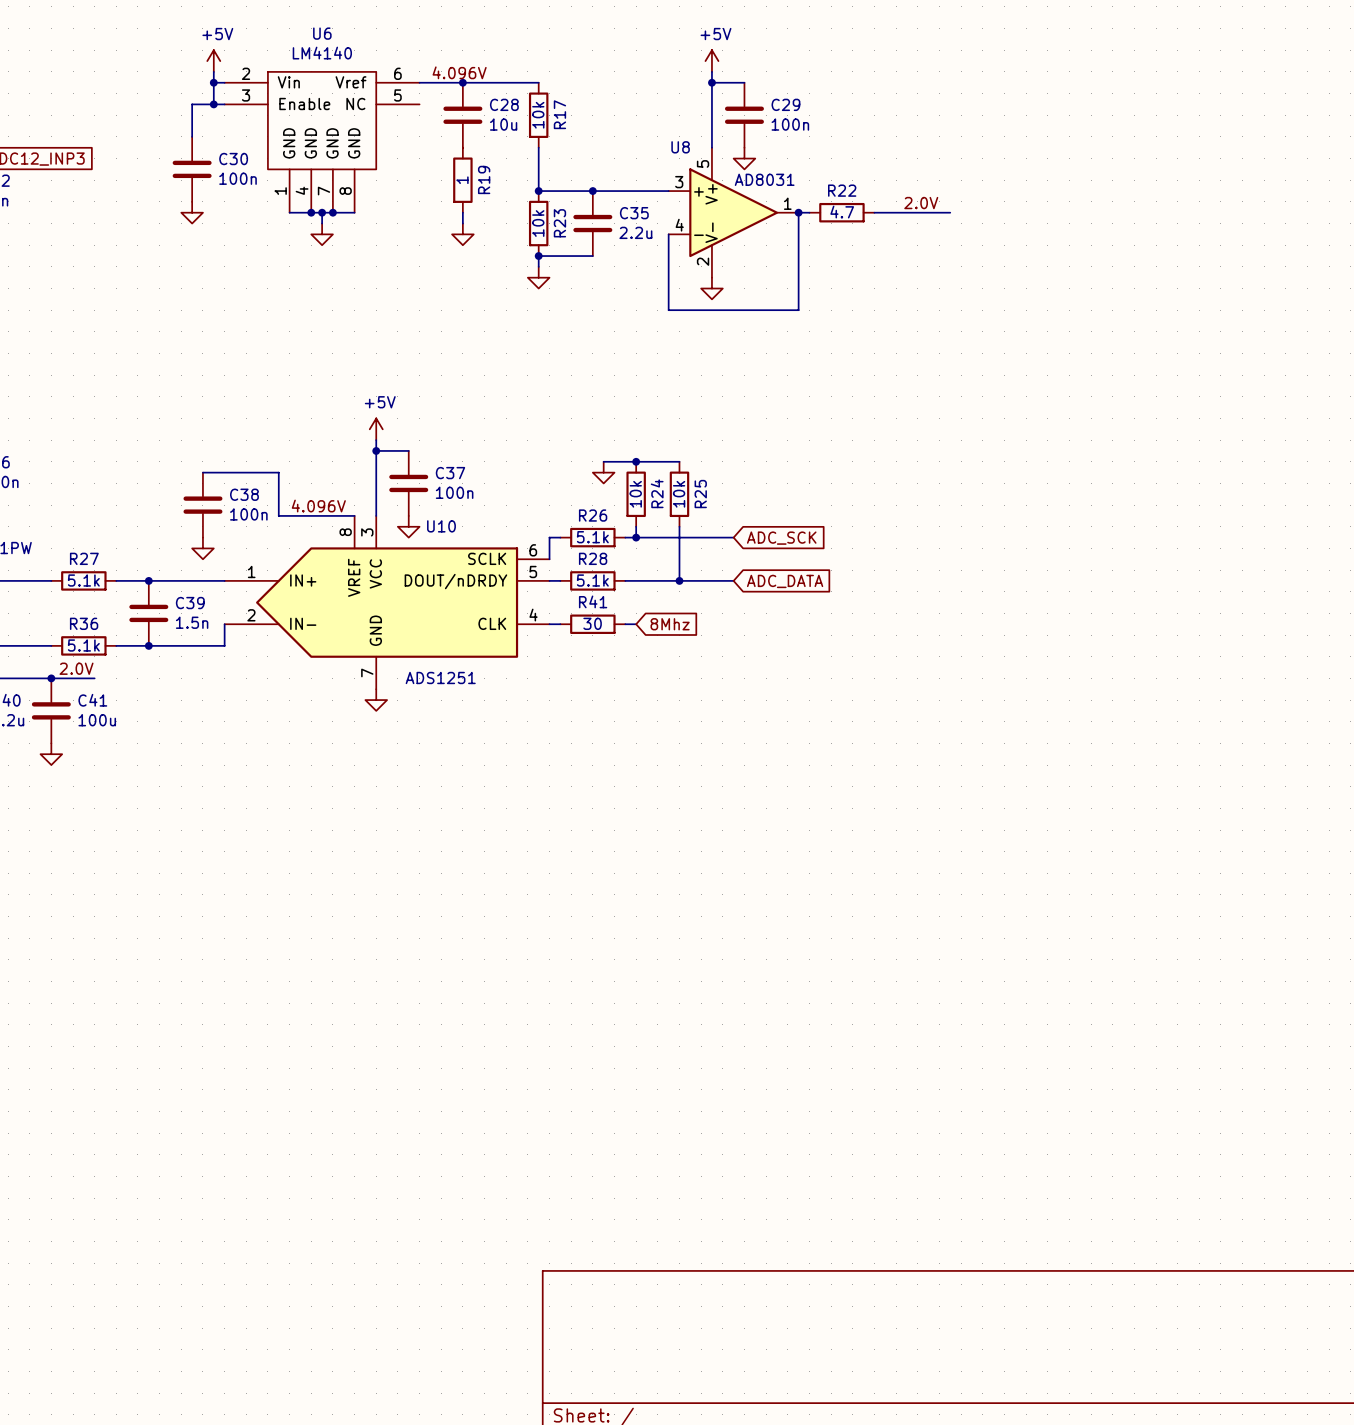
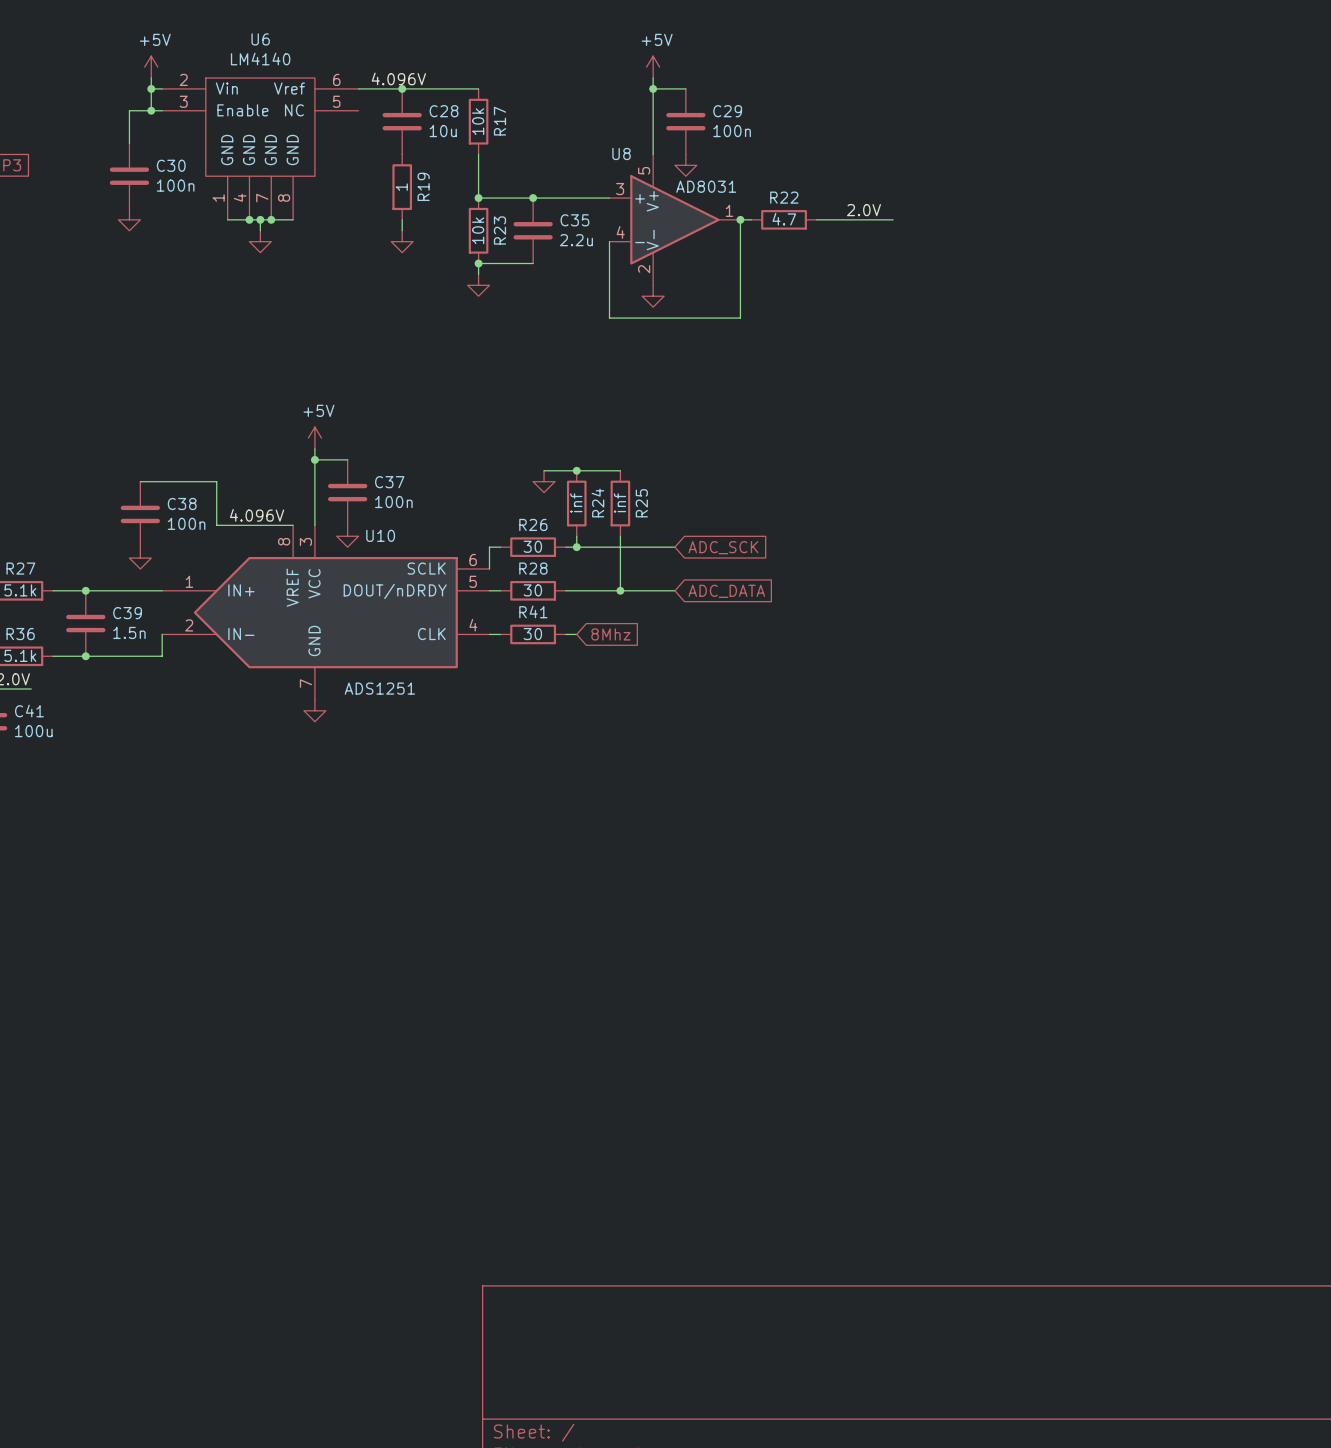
R24 value: 10k (635, 494) -> inf (576, 503)
R25 value: 10k (679, 494) -> inf (620, 503)
R26 value: 5.1k (592, 537) -> 30 (532, 546)
R28 value: 5.1k (592, 580) -> 30 (532, 590)

